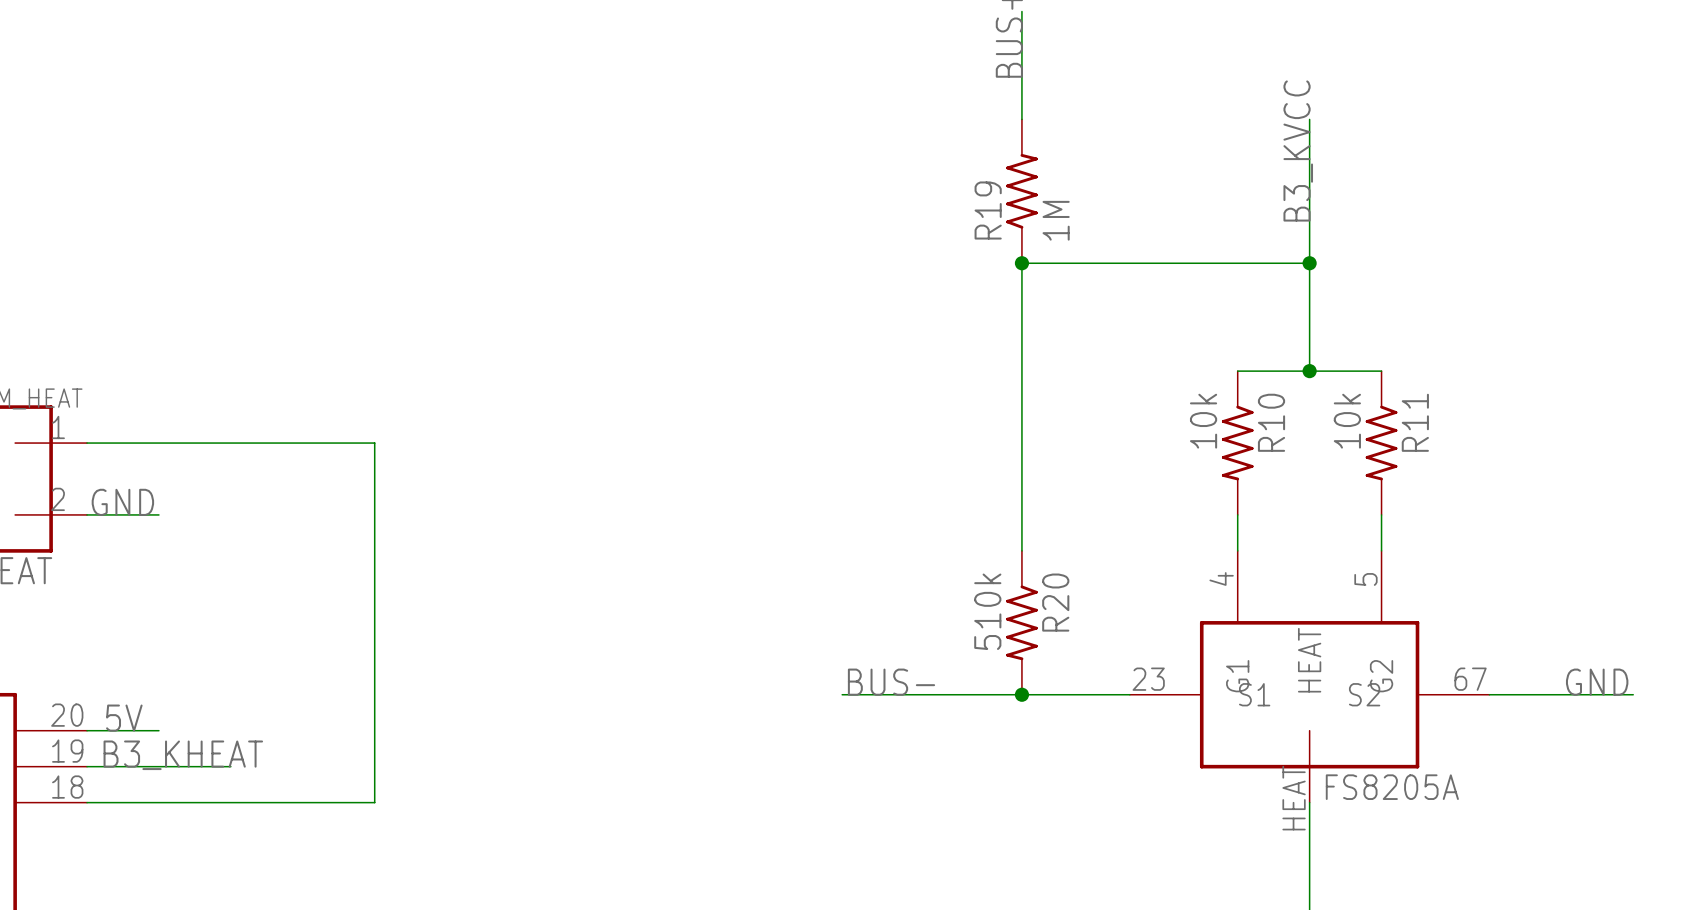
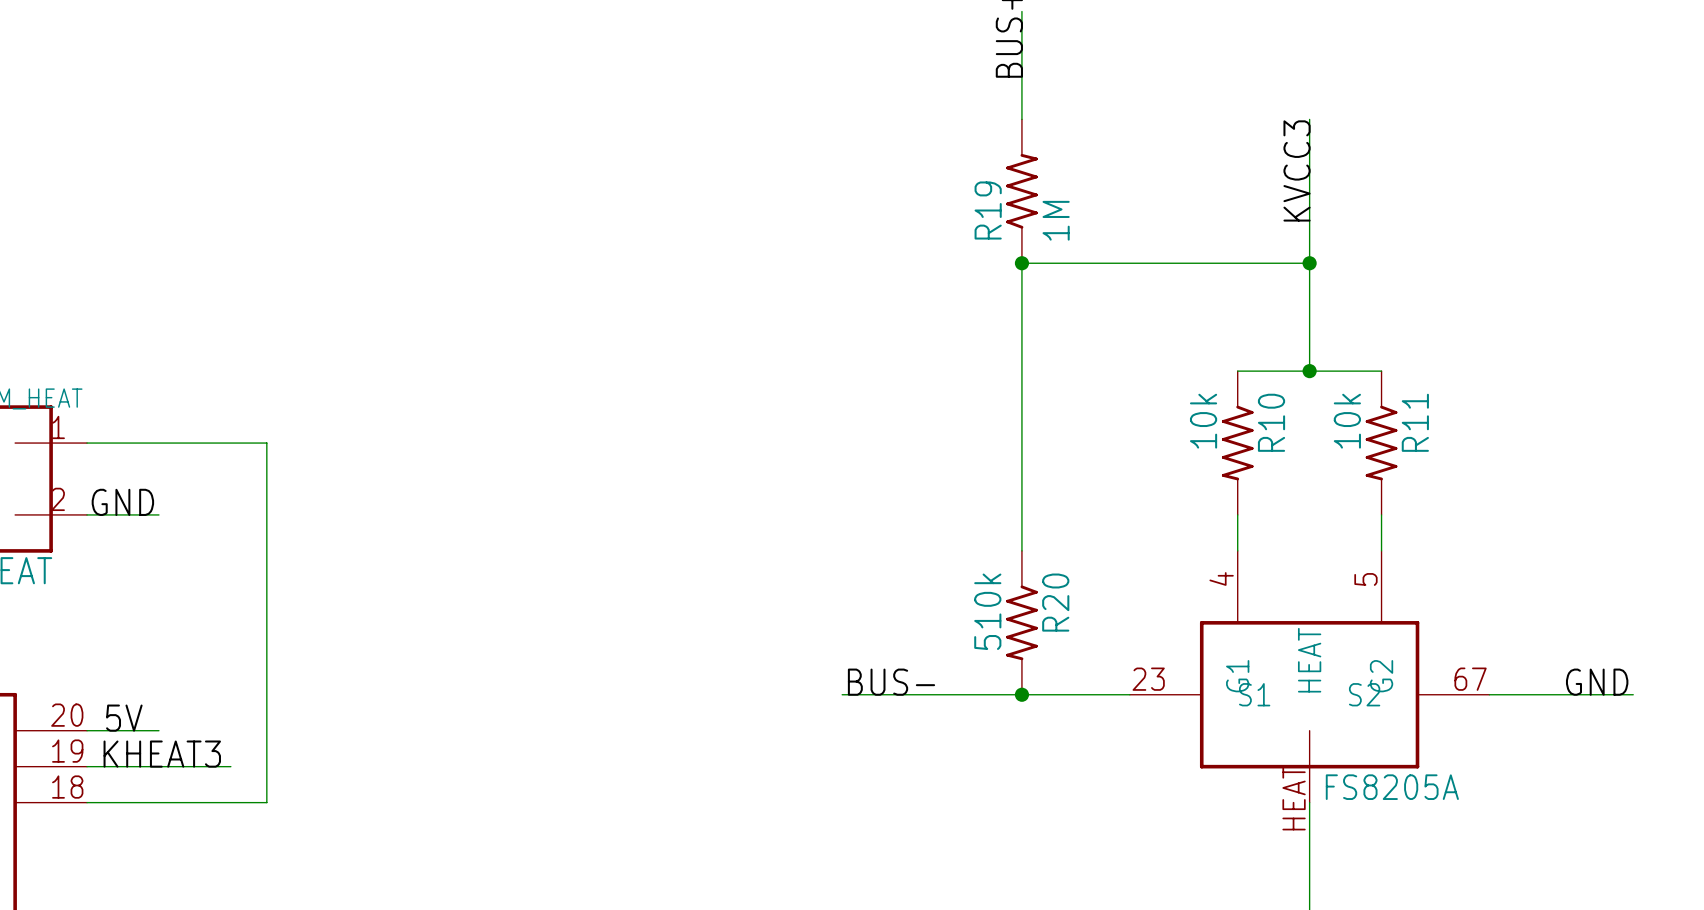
label: B3_KVCC (1298, 150) -> KVCC3 (1297, 170)
wire: (266, 443) (374, 443) (374, 802) (266, 802) -> (266, 443) (266, 802)
label: B3_KHEAT (183, 755) -> KHEAT3 (162, 754)

